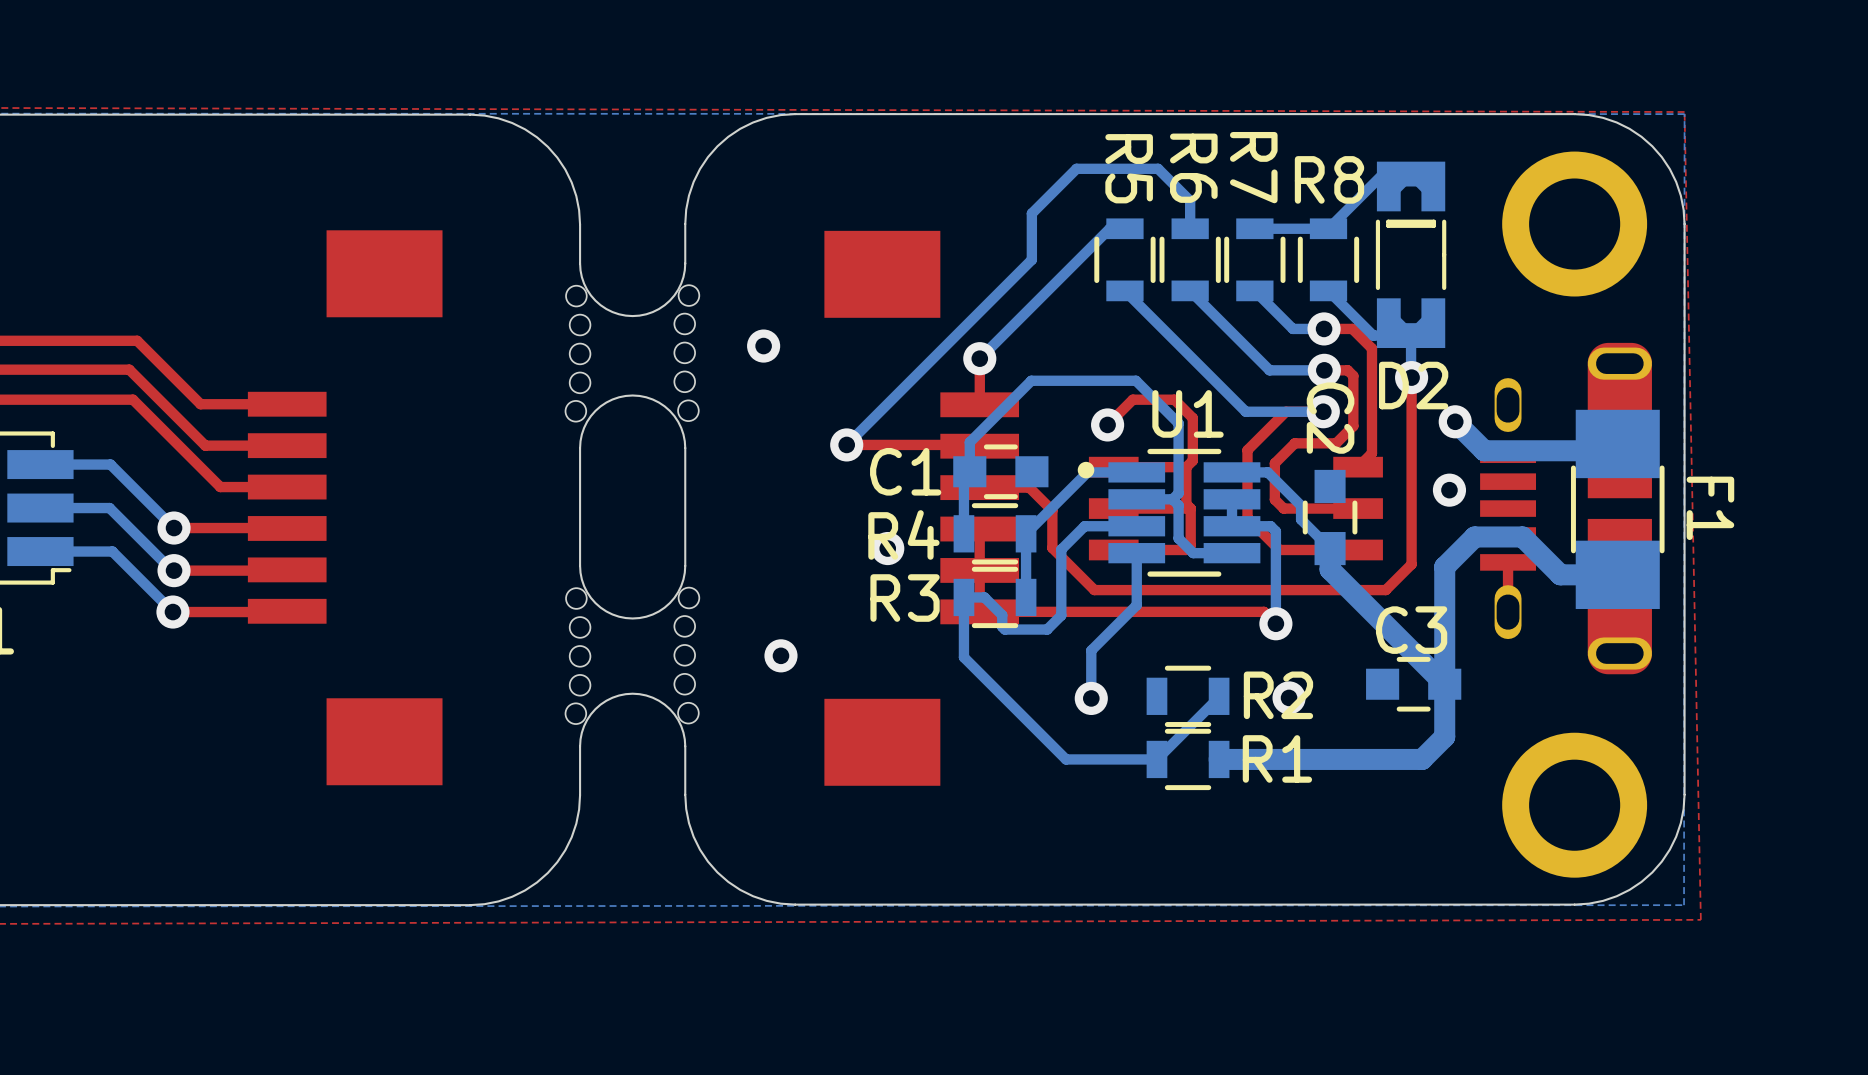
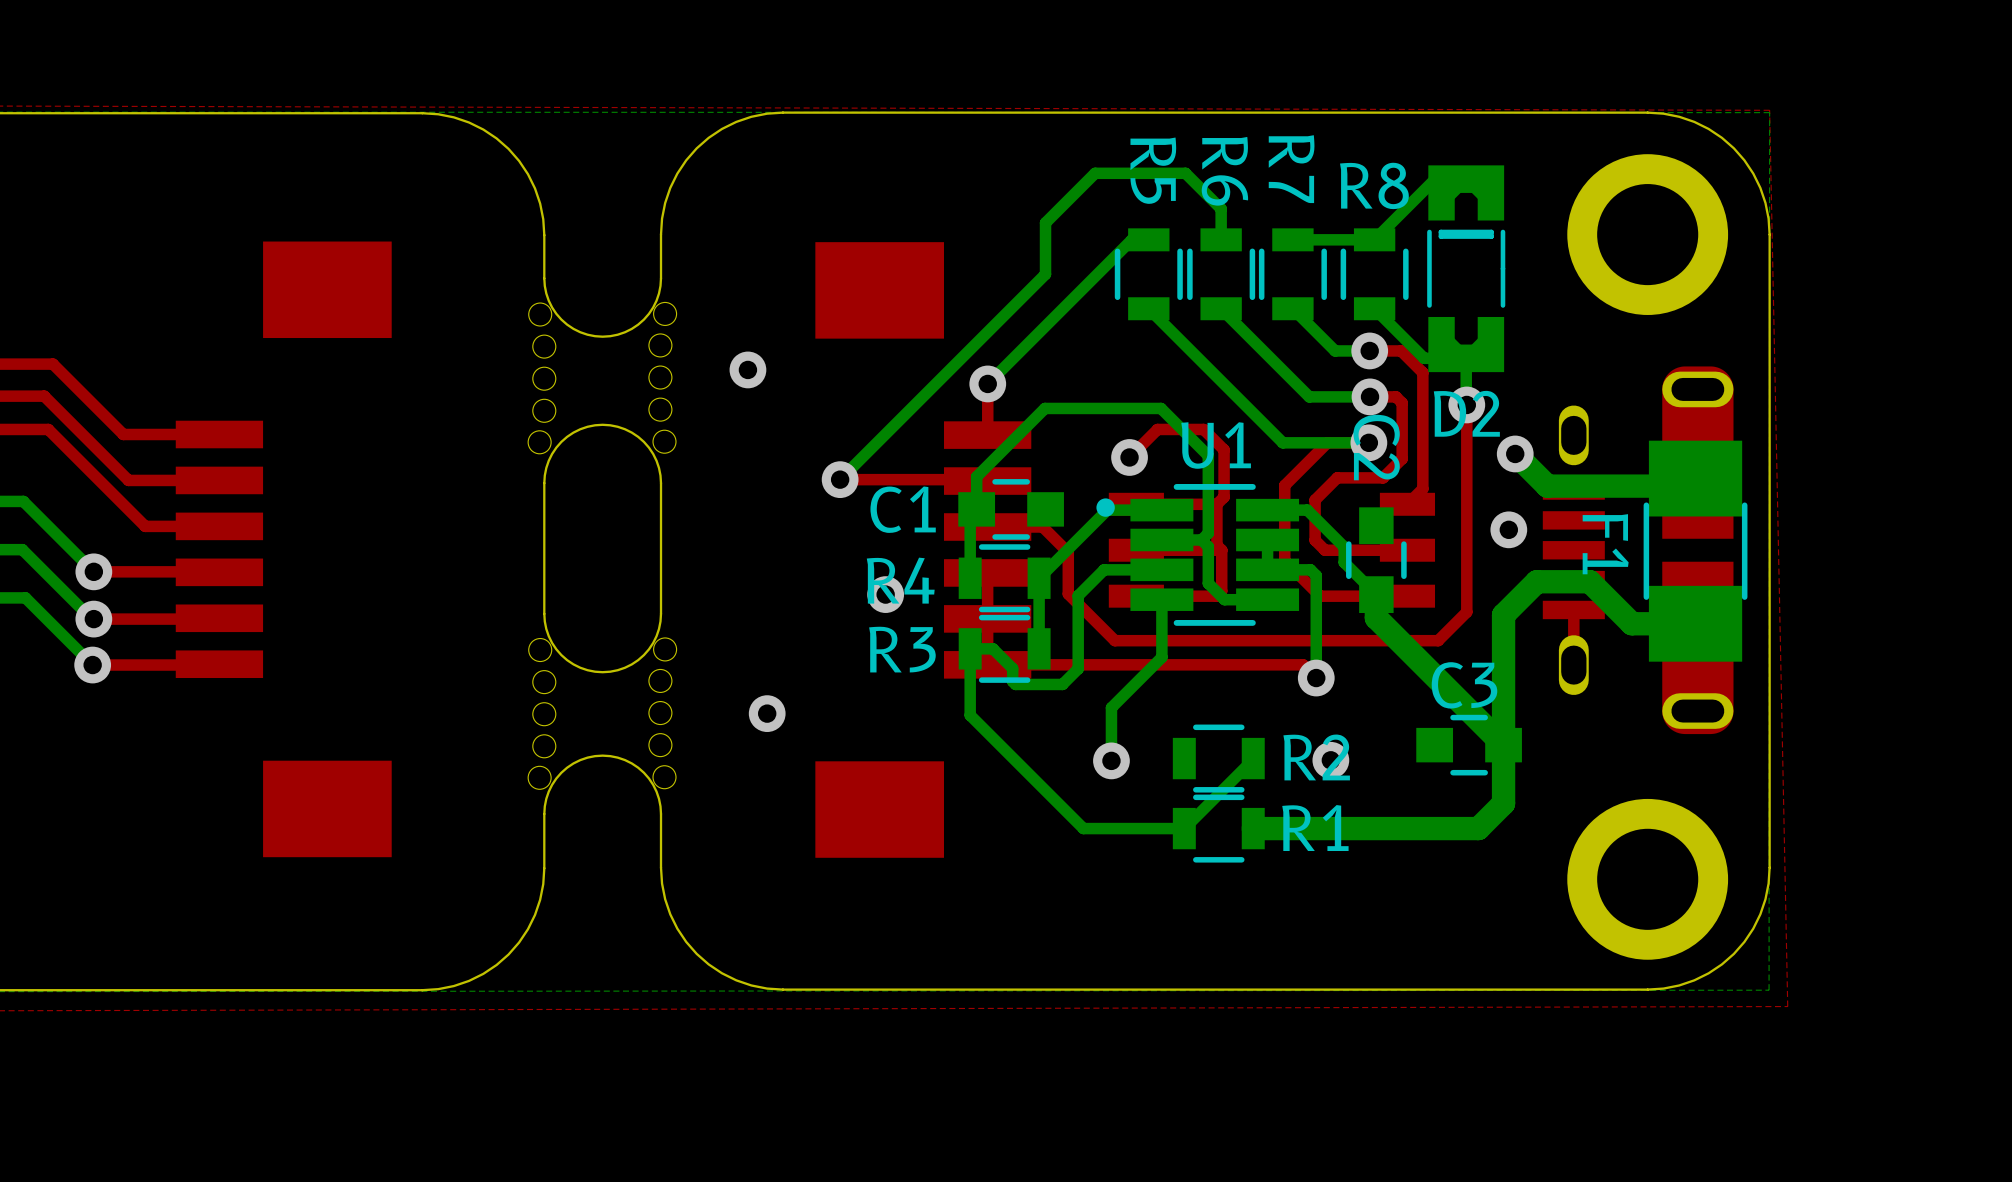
F1 name position: F1 (1710, 508) -> F1 (1605, 544)

